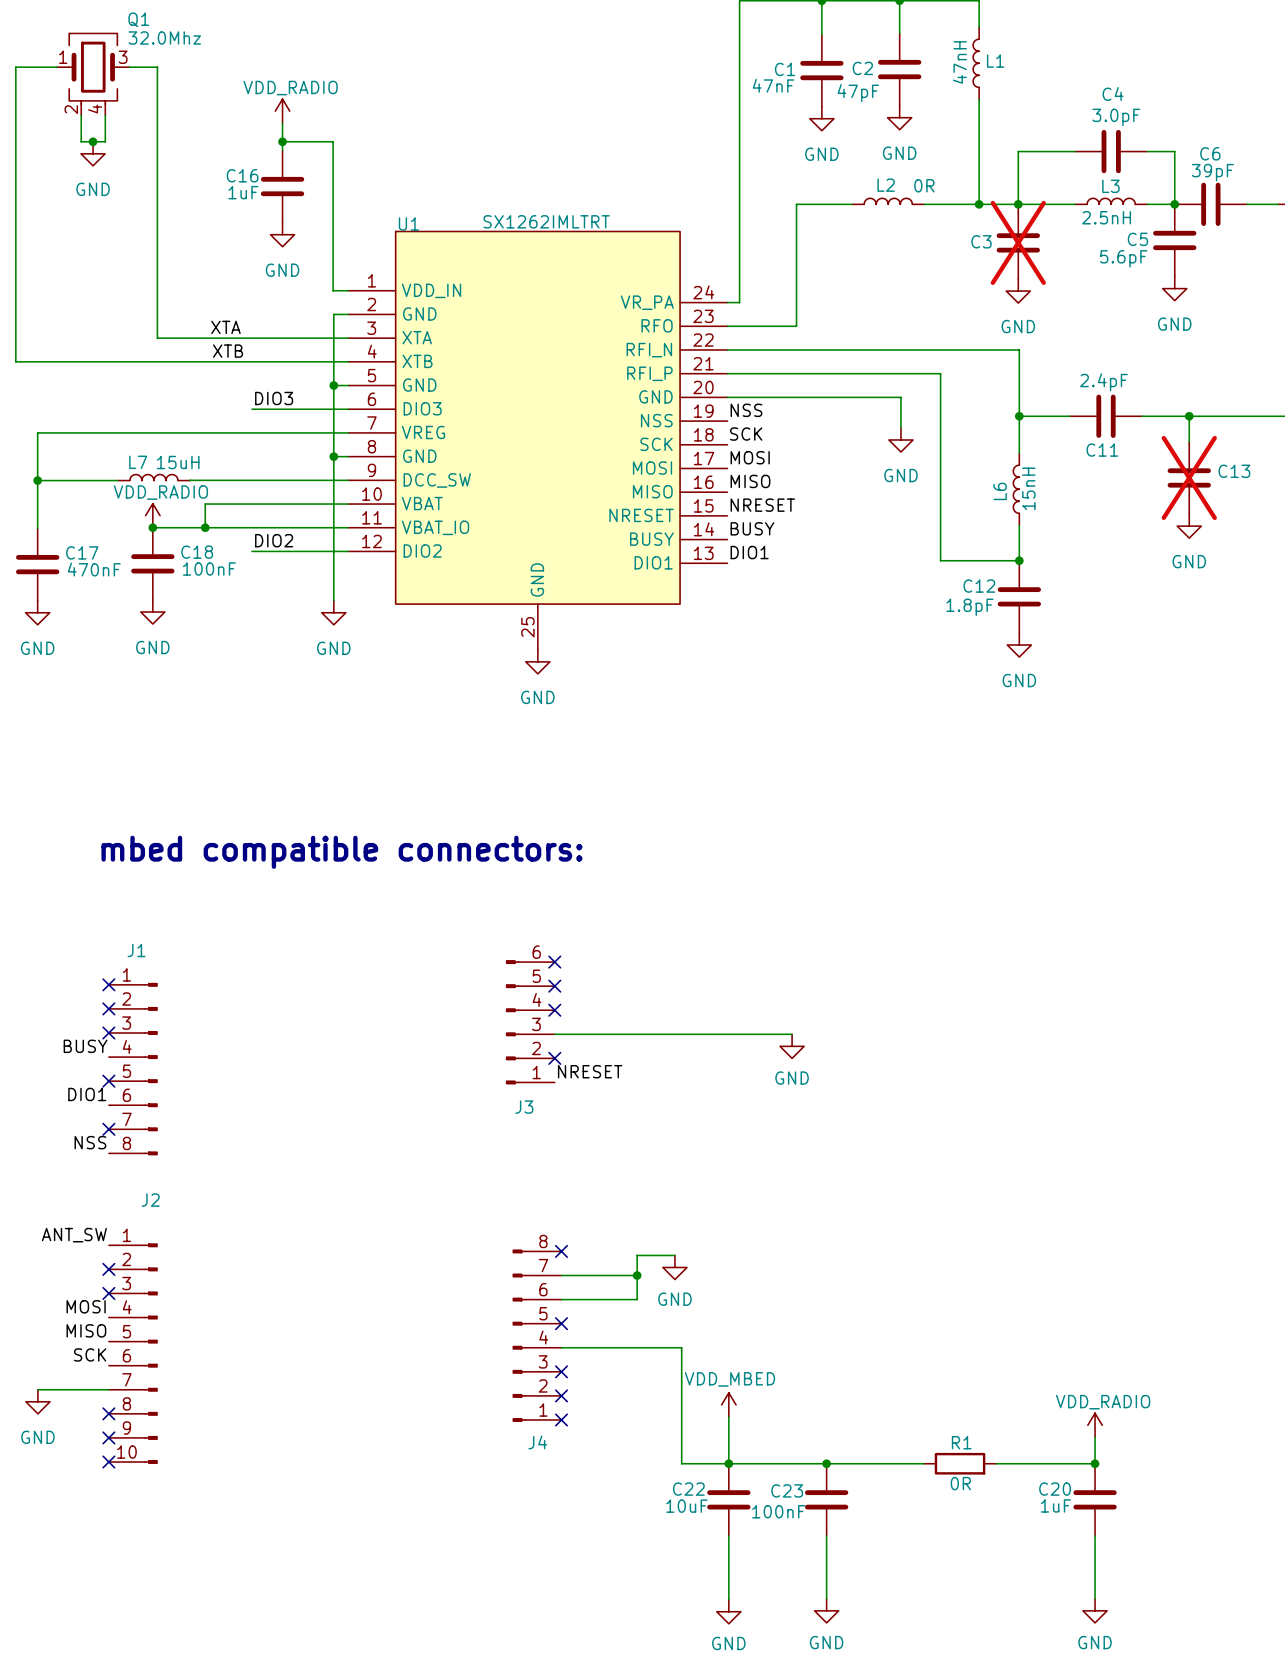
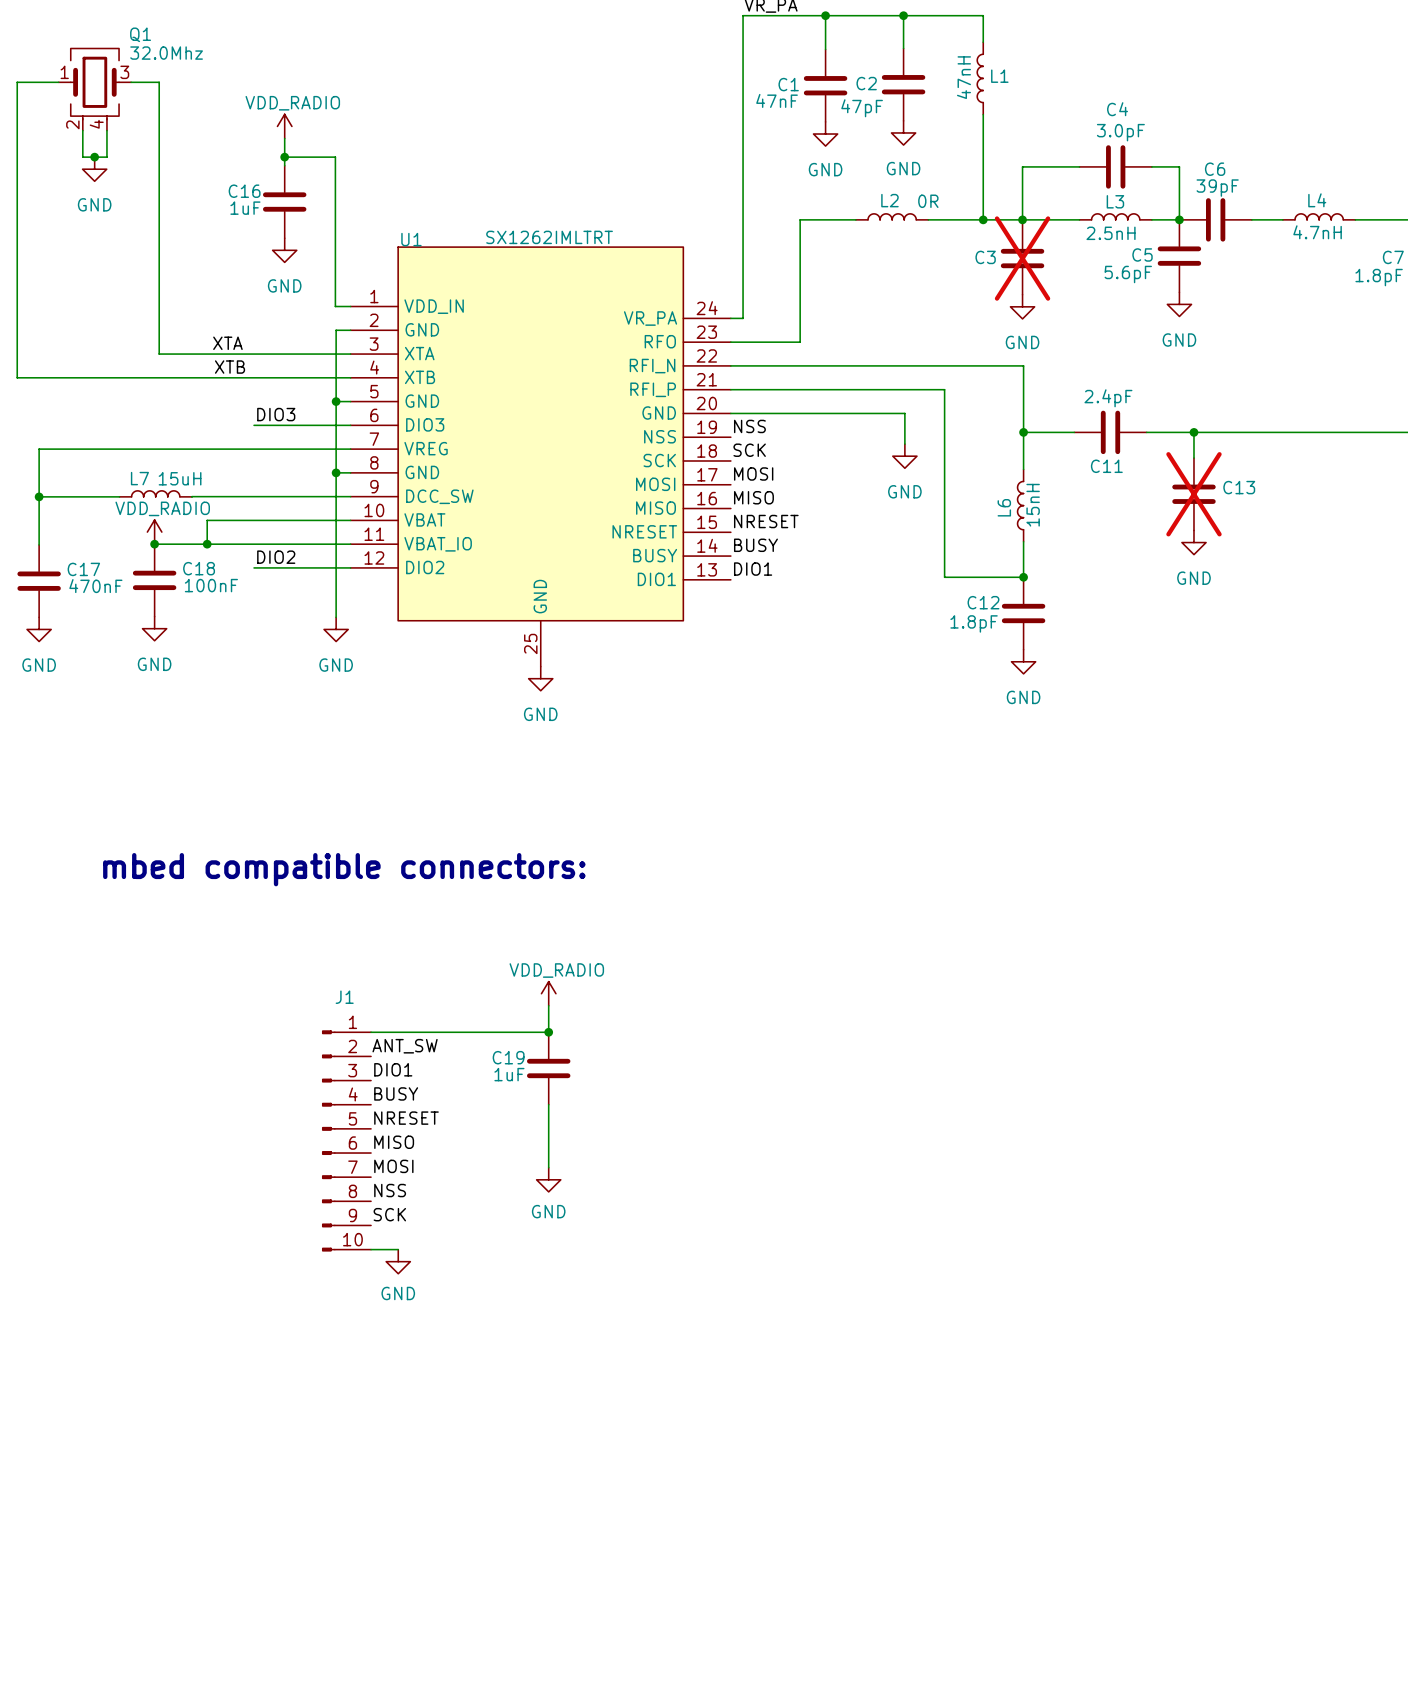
J1 name position: J1 (136, 950) -> J1 (344, 997)
no-connect mark: (554, 962) -> none
power symbol: none -> VDD_RADIO (548, 993)
J1 symbol: [108, 982, 158, 1156] -> [322, 1030, 372, 1252]
no-connect mark: (108, 984) -> none
no-connect mark: (554, 986) -> none
wire: none -> (548, 1005) (548, 1032) (371, 1032)
no-connect mark: (108, 1008) -> none
no-connect mark: (554, 1010) -> none
junction: none -> (548, 1032)
J3: (530, 1022) -> none
label: none -> ANT_SW (405, 1046)
no-connect mark: (108, 1032) -> none
wire: (554, 1034) (792, 1034) -> none
label: BUSY (85, 1046) -> none
power symbol: GND (792, 1046) -> none
C19: none -> 1uF (548, 1068)
label: none -> DIO1 (393, 1069)
no-connect mark: (554, 1058) -> none
label position: NRESET (590, 1071) -> NRESET (406, 1118)
label: none -> BUSY (396, 1093)
no-connect mark: (108, 1081) -> none
wire: none -> (548, 1104) (548, 1167)
label: DIO1 (87, 1094) -> none
label: none -> MISO (394, 1142)
no-connect mark: (108, 1129) -> none
label: NSS (90, 1142) -> none
label: none -> MOSI (393, 1166)
power symbol: none -> GND (548, 1179)
label: none -> NSS (390, 1190)
label: none -> SCK (389, 1214)
wire: none -> (371, 1249) (398, 1249)
label: ANT_SW (74, 1235) -> none
power symbol: none -> GND (398, 1261)
no-connect mark: (561, 1251) -> none
wire: (674, 1255) (637, 1255) (637, 1299) (561, 1299) -> none
power symbol: GND (674, 1267) -> none
no-connect mark: (108, 1269) -> none
wire: (561, 1275) (637, 1275) -> none
junction: (637, 1275) -> none
no-connect mark: (108, 1293) -> none
label: MOSI (86, 1306) -> none
no-connect mark: (561, 1323) -> none
label: MISO (86, 1330) -> none
J4: (537, 1335) -> none
wire: (561, 1347) (681, 1347) (681, 1463) (923, 1463) -> none
J2: (133, 1353) -> none
label: SCK (90, 1354) -> none
no-connect mark: (561, 1371) -> none
wire: (37, 1389) (108, 1389) -> none
no-connect mark: (561, 1395) -> none
power symbol: GND (37, 1401) -> none
power symbol: VDD_MBED (728, 1404) -> none
no-connect mark: (108, 1413) -> none
wire: (728, 1416) (728, 1463) -> none
no-connect mark: (561, 1419) -> none
power symbol: VDD_RADIO (1095, 1425) -> none
no-connect mark: (108, 1437) -> none
wire: (1095, 1437) (1095, 1463) (996, 1463) -> none
no-connect mark: (108, 1462) -> none
junction: (728, 1463) -> none
junction: (826, 1463) -> none
R1: 0R (960, 1463) -> none
junction: (1095, 1463) -> none
C22: 10uF (728, 1499) -> none
C23: 100nF (826, 1499) -> none
C20: 1uF (1095, 1499) -> none
wire: (728, 1535) (728, 1599) -> none
wire: (826, 1535) (826, 1598) -> none
wire: (1095, 1535) (1095, 1598) -> none
power symbol: GND (826, 1610) -> none
power symbol: GND (1095, 1610) -> none
power symbol: GND (728, 1611) -> none

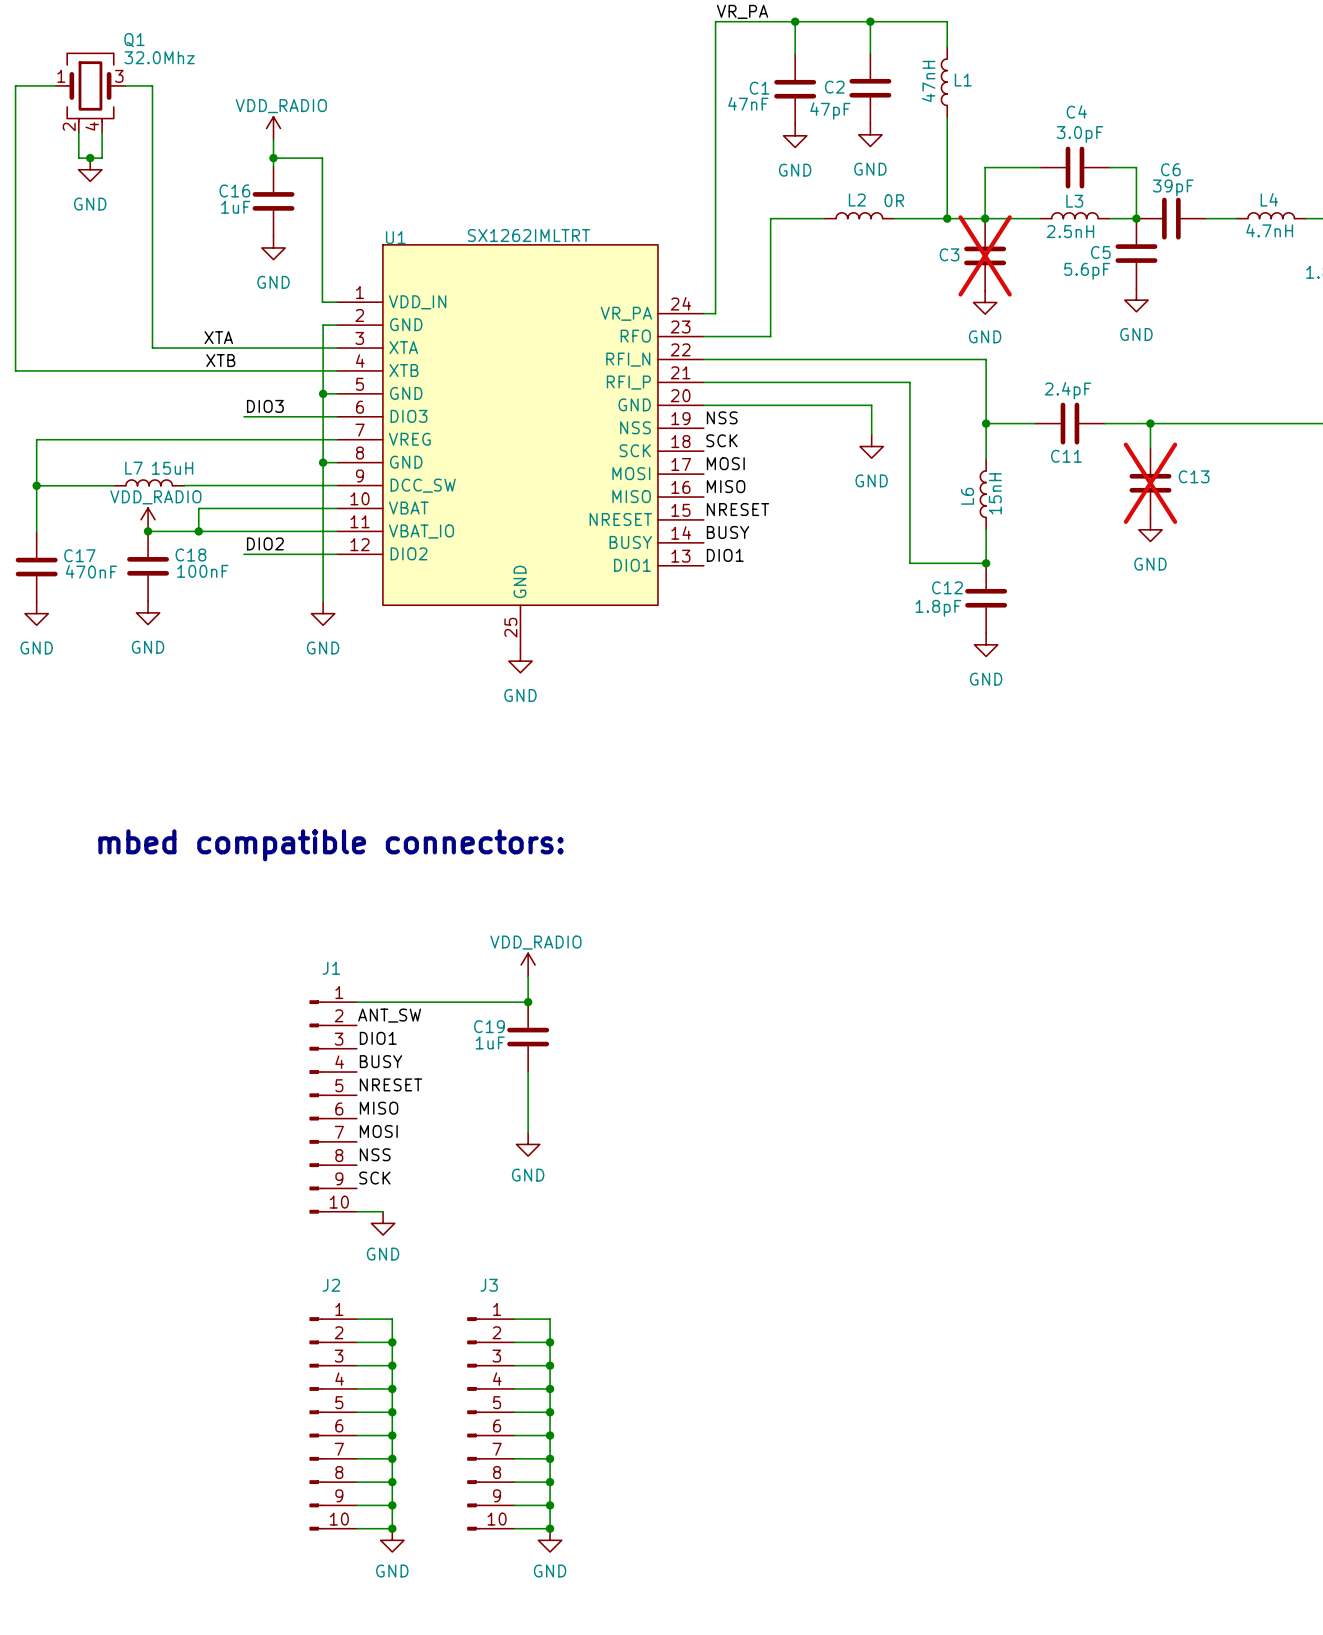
wire: none -> (356, 1319) (392, 1319) (392, 1528) (356, 1528)
wire: none -> (514, 1319) (550, 1319) (550, 1528) (514, 1528)
wire: none -> (356, 1342) (392, 1342)
junction: none -> (392, 1342)
wire: none -> (514, 1342) (550, 1342)
junction: none -> (550, 1342)
wire: none -> (356, 1365) (392, 1365)
junction: none -> (392, 1365)
wire: none -> (514, 1365) (550, 1365)
junction: none -> (550, 1365)
wire: none -> (356, 1388) (392, 1388)
junction: none -> (392, 1388)
wire: none -> (514, 1388) (550, 1388)
junction: none -> (550, 1388)
wire: none -> (356, 1412) (392, 1412)
junction: none -> (392, 1412)
wire: none -> (514, 1412) (550, 1412)
junction: none -> (550, 1412)
J2: none -> (333, 1423)
J3: none -> (490, 1423)
wire: none -> (356, 1435) (392, 1435)
junction: none -> (392, 1435)
wire: none -> (514, 1435) (550, 1435)
junction: none -> (550, 1435)
wire: none -> (356, 1458) (392, 1458)
junction: none -> (392, 1458)
wire: none -> (514, 1458) (550, 1458)
junction: none -> (550, 1458)
wire: none -> (356, 1482) (392, 1482)
junction: none -> (392, 1482)
wire: none -> (514, 1482) (550, 1482)
junction: none -> (550, 1482)
wire: none -> (356, 1505) (392, 1505)
junction: none -> (392, 1505)
wire: none -> (514, 1505) (550, 1505)
junction: none -> (550, 1505)
junction: none -> (392, 1528)
junction: none -> (550, 1528)
power symbol: none -> GND (392, 1540)
power symbol: none -> GND (550, 1540)

